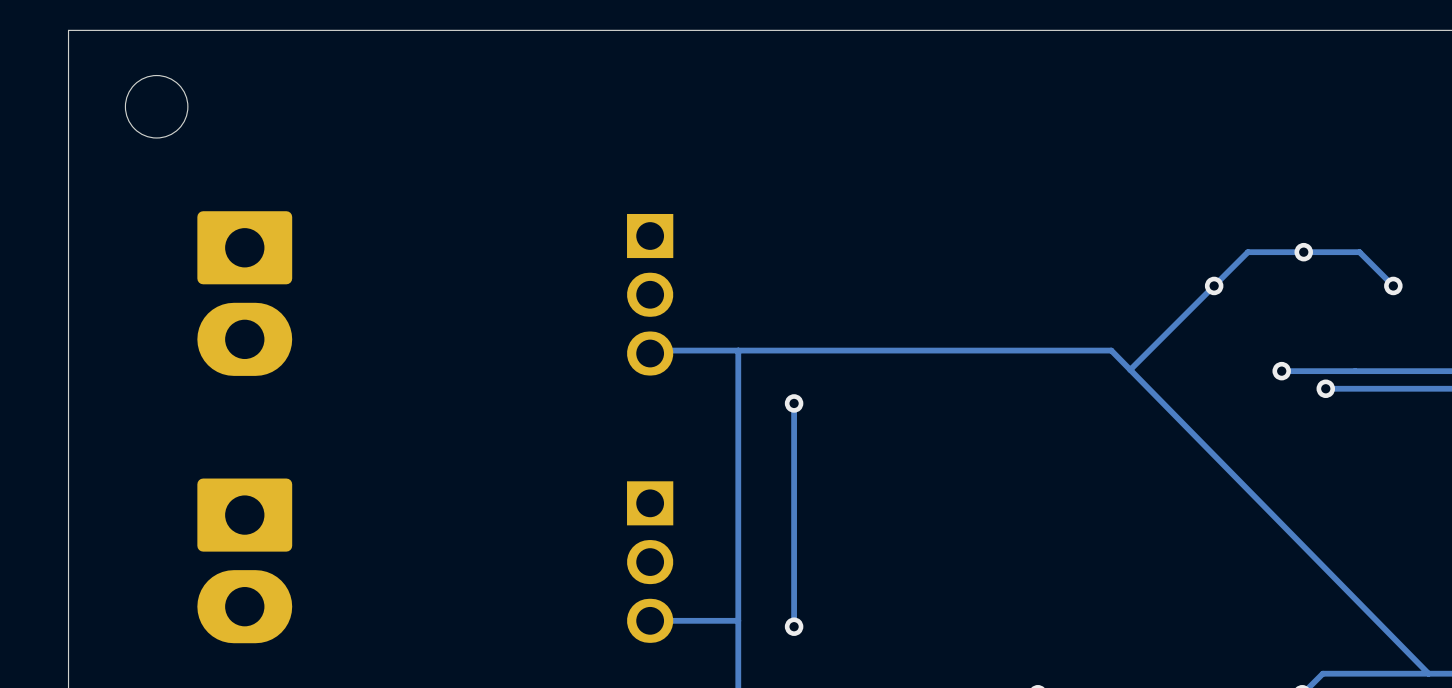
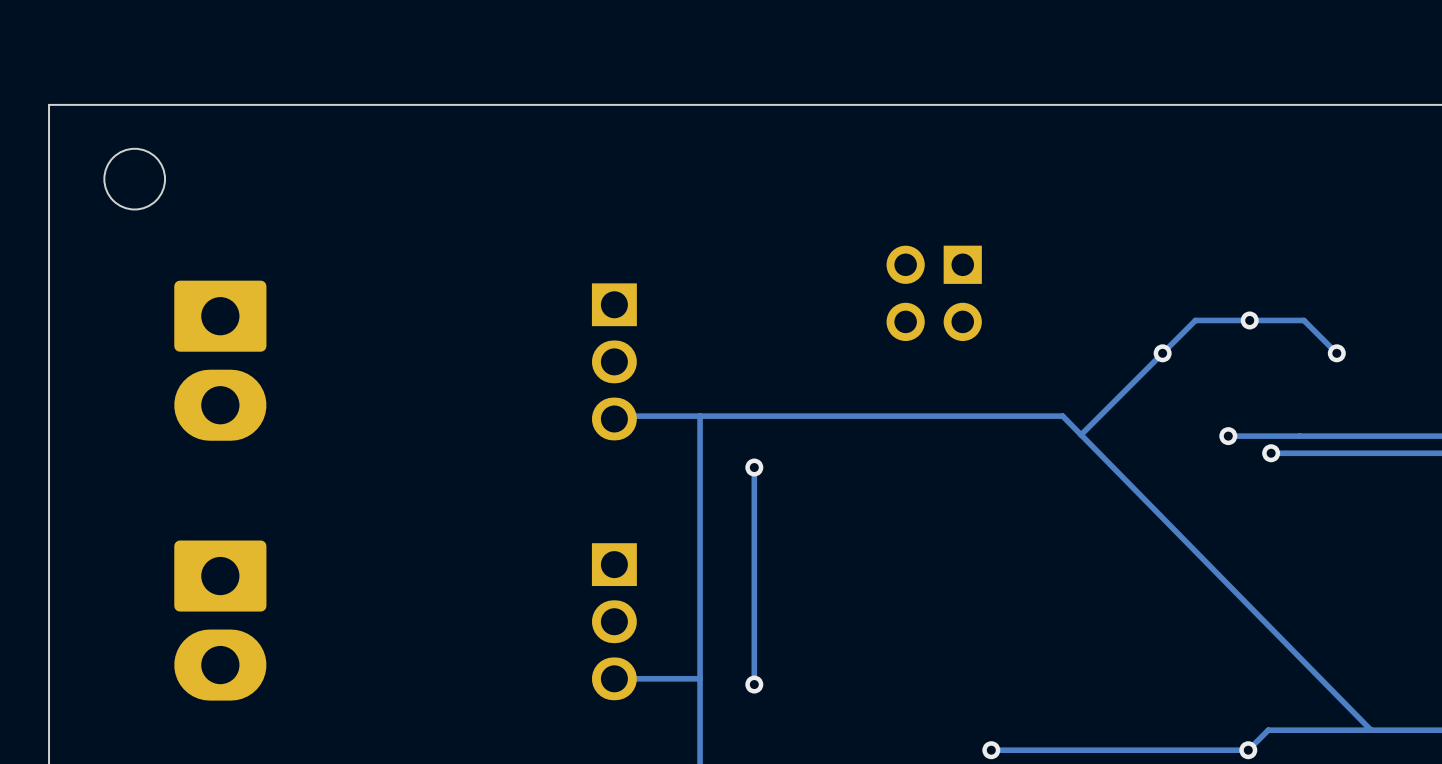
part: none -> (934, 293)

